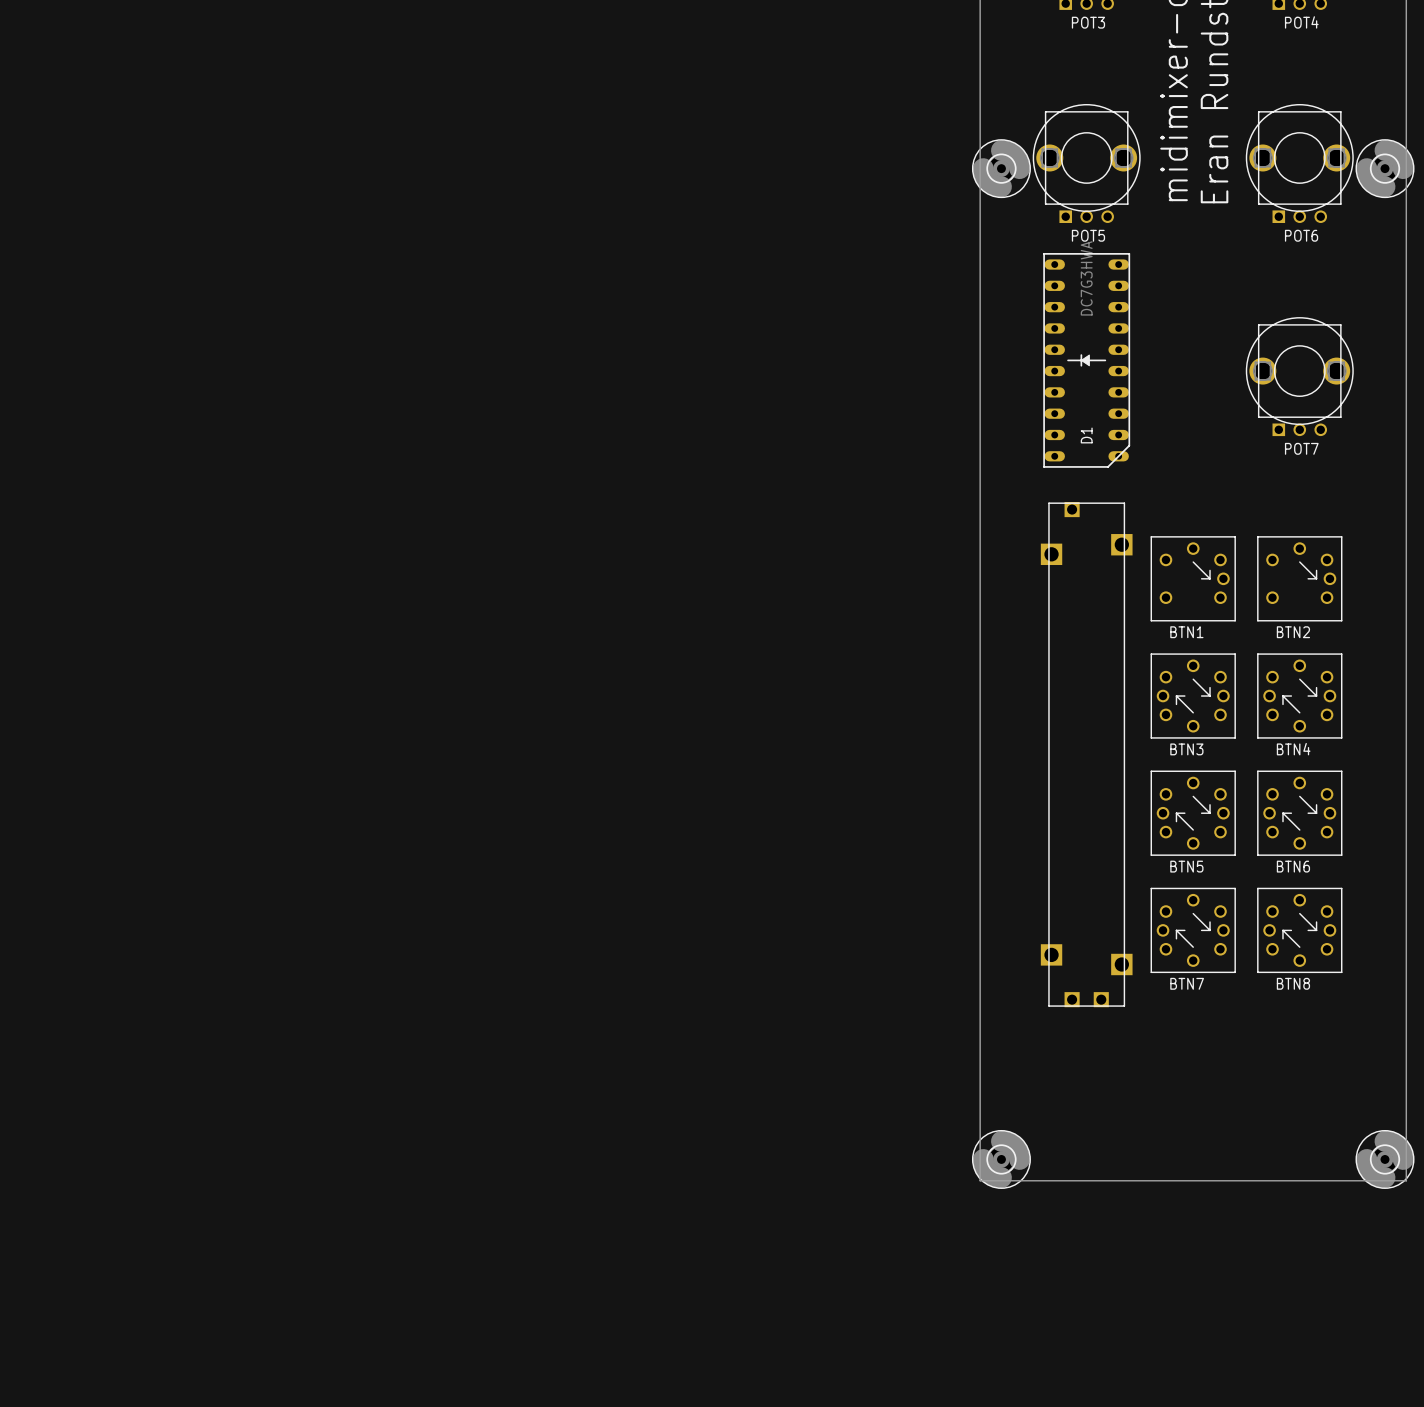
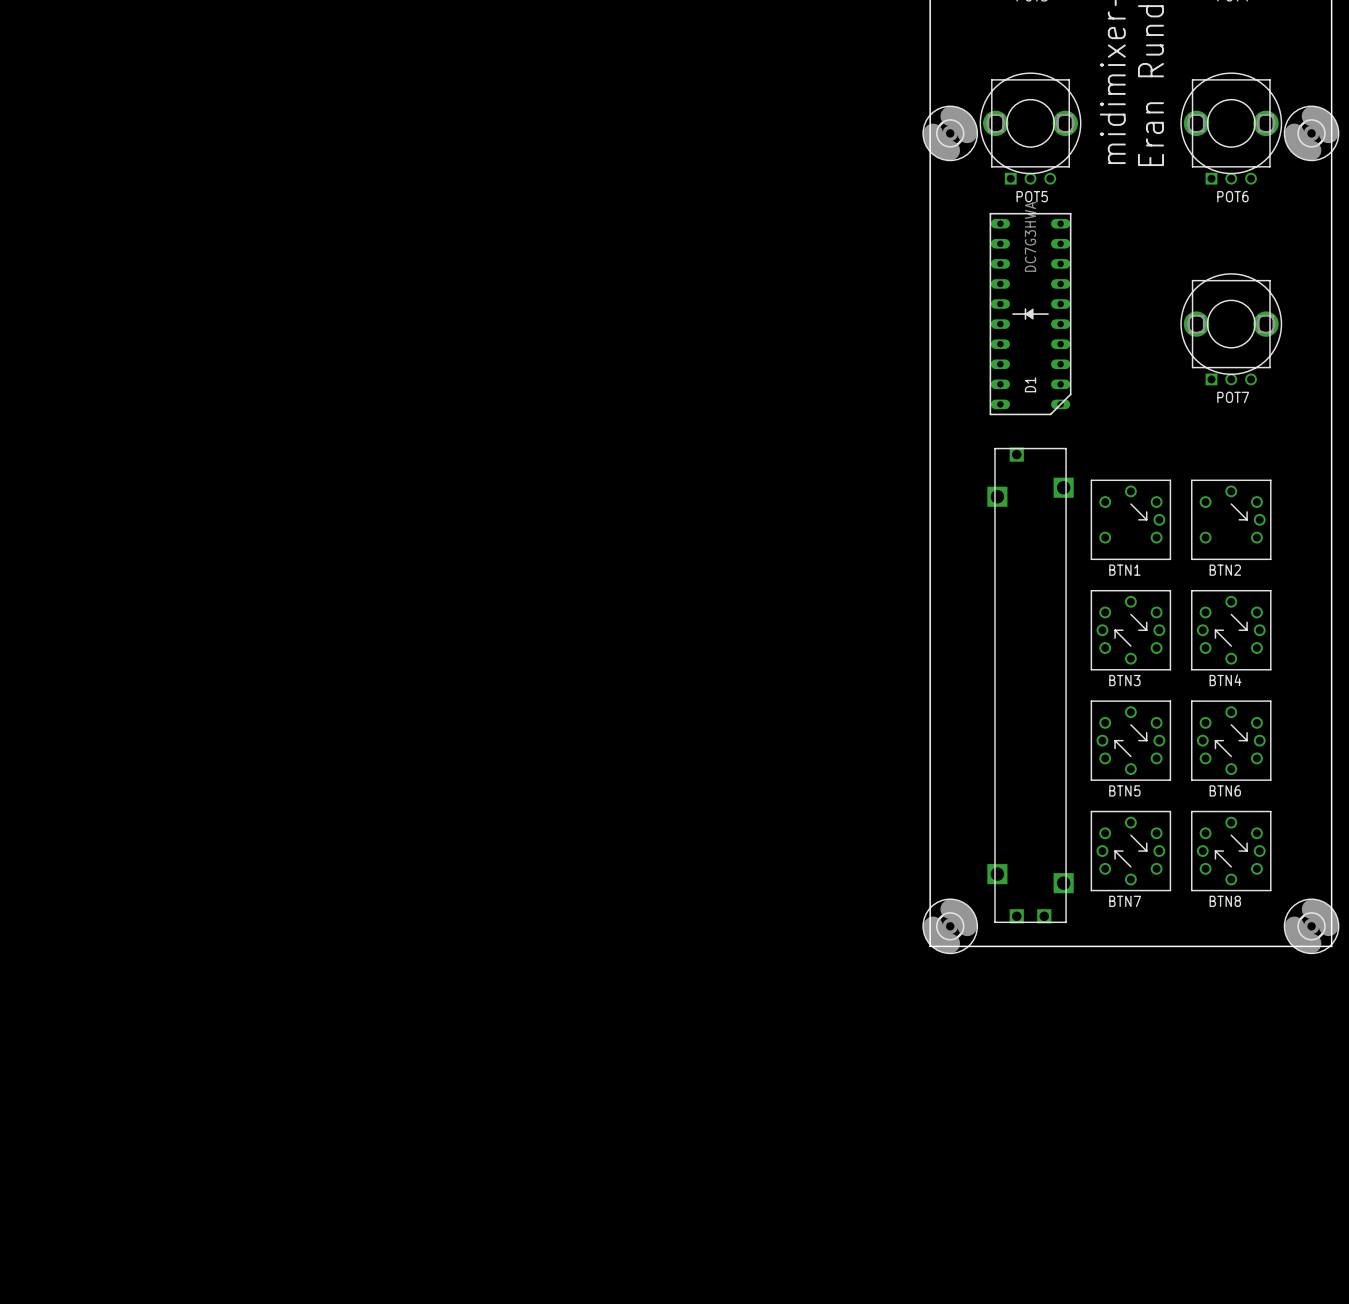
board edge: (980, 1031) (980, 1180) (1406, 1180) (1406, 1031) -> (930, 946) (1331, 946)
part position: (1001, 1159) -> (950, 926)
part position: (1385, 1159) -> (1311, 926)

